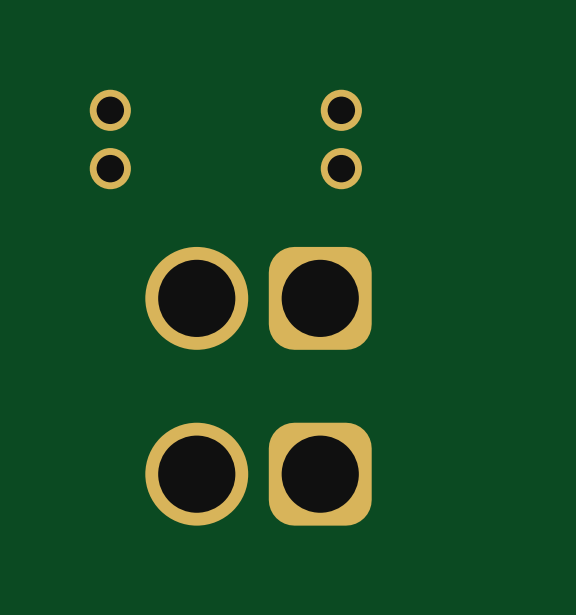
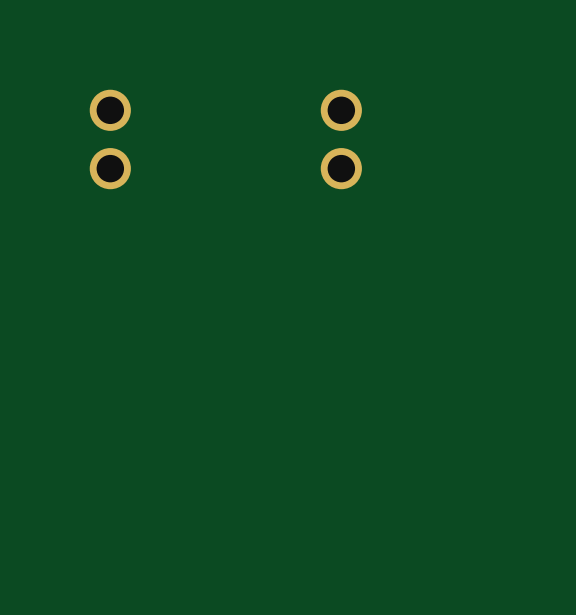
part: (258, 298) -> none
part: (258, 474) -> none

